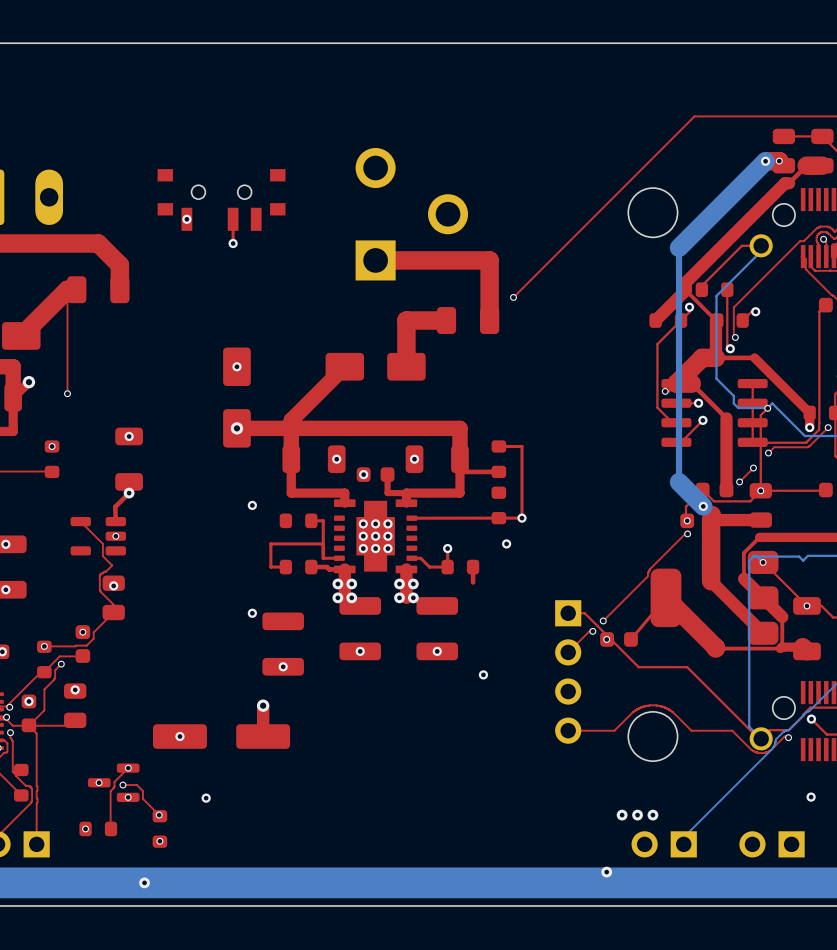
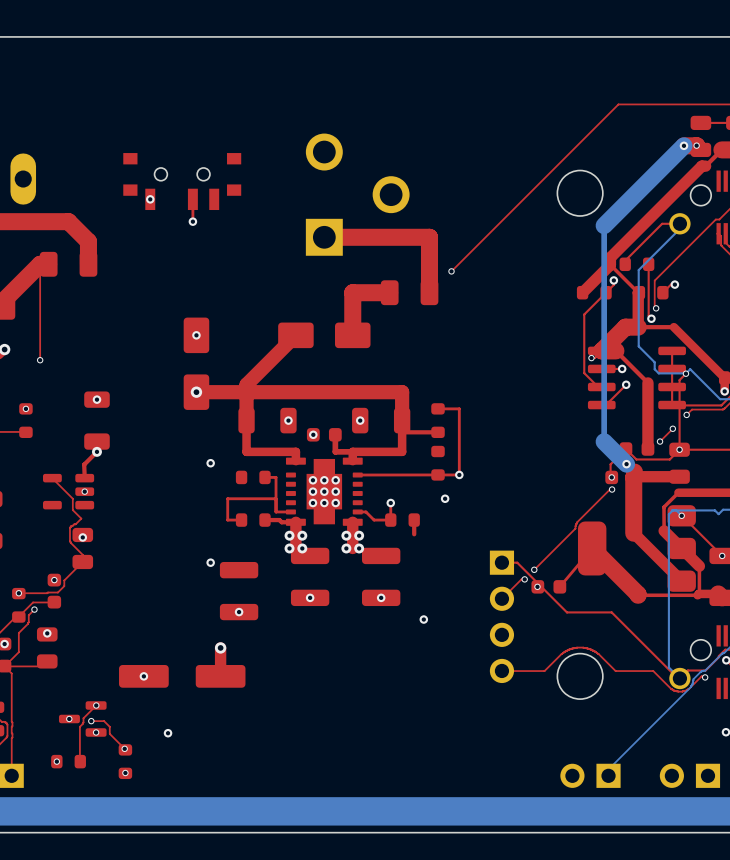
via: (622, 815) -> none
via: (637, 815) -> none
via: (652, 815) -> none
via: (606, 872) -> none
via: (144, 882) -> none

